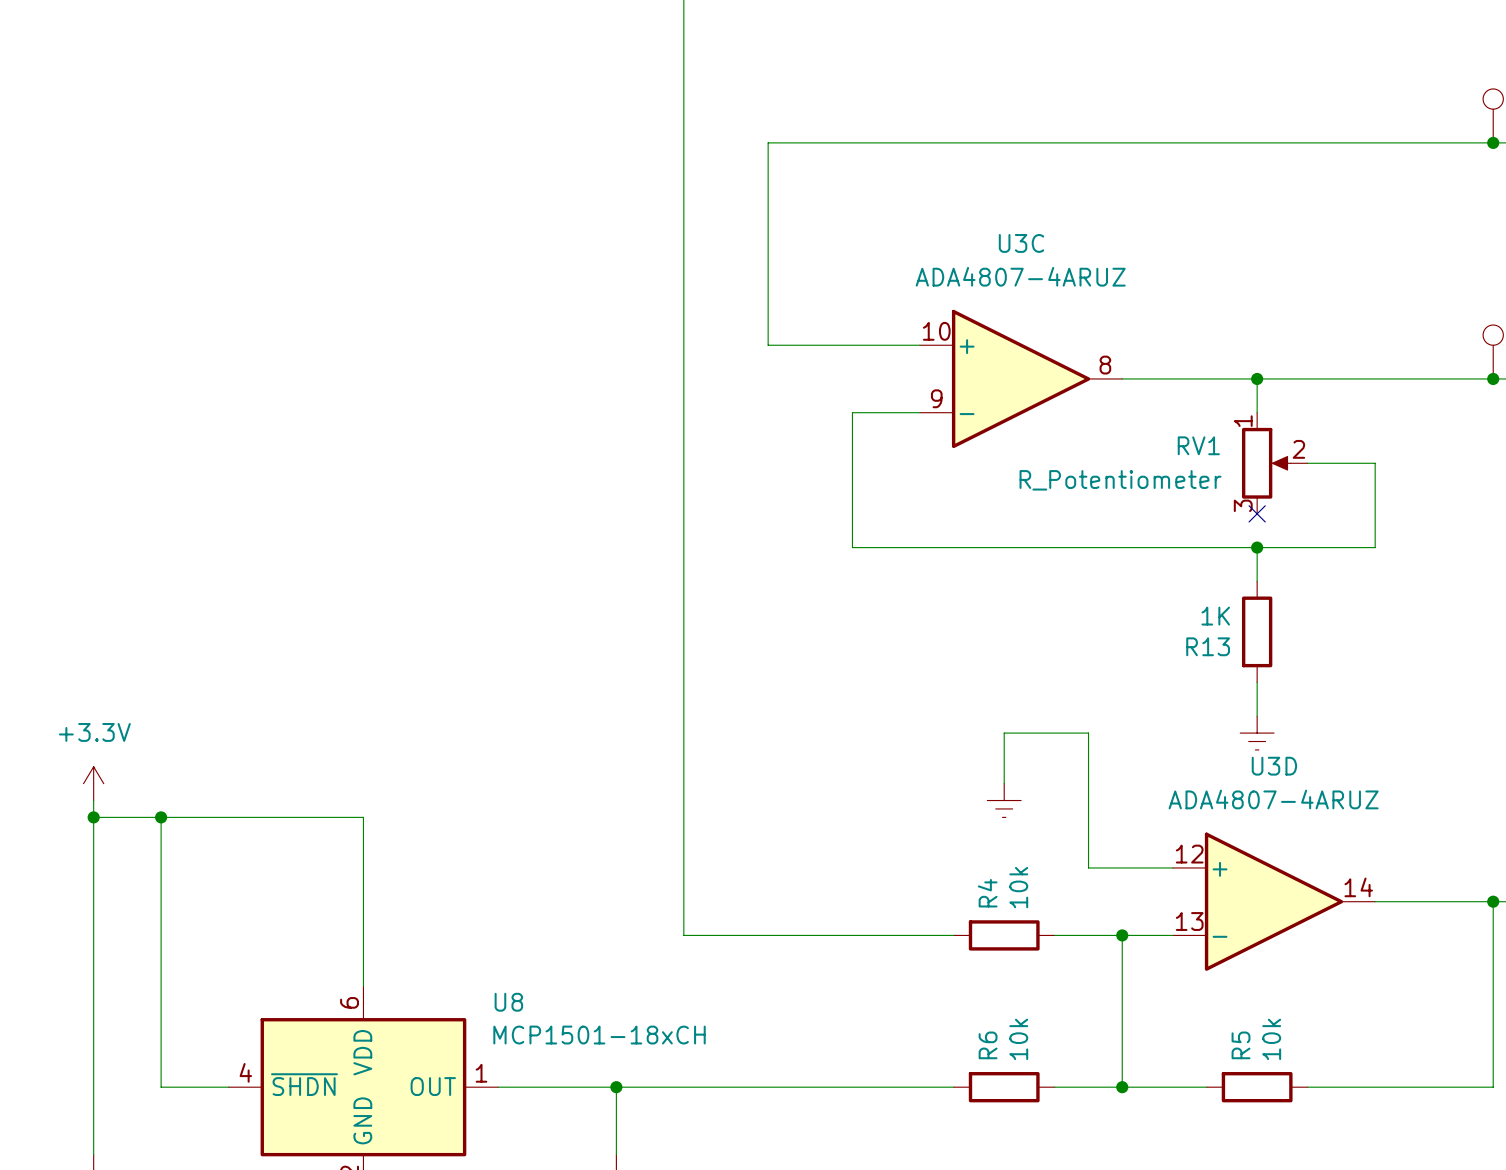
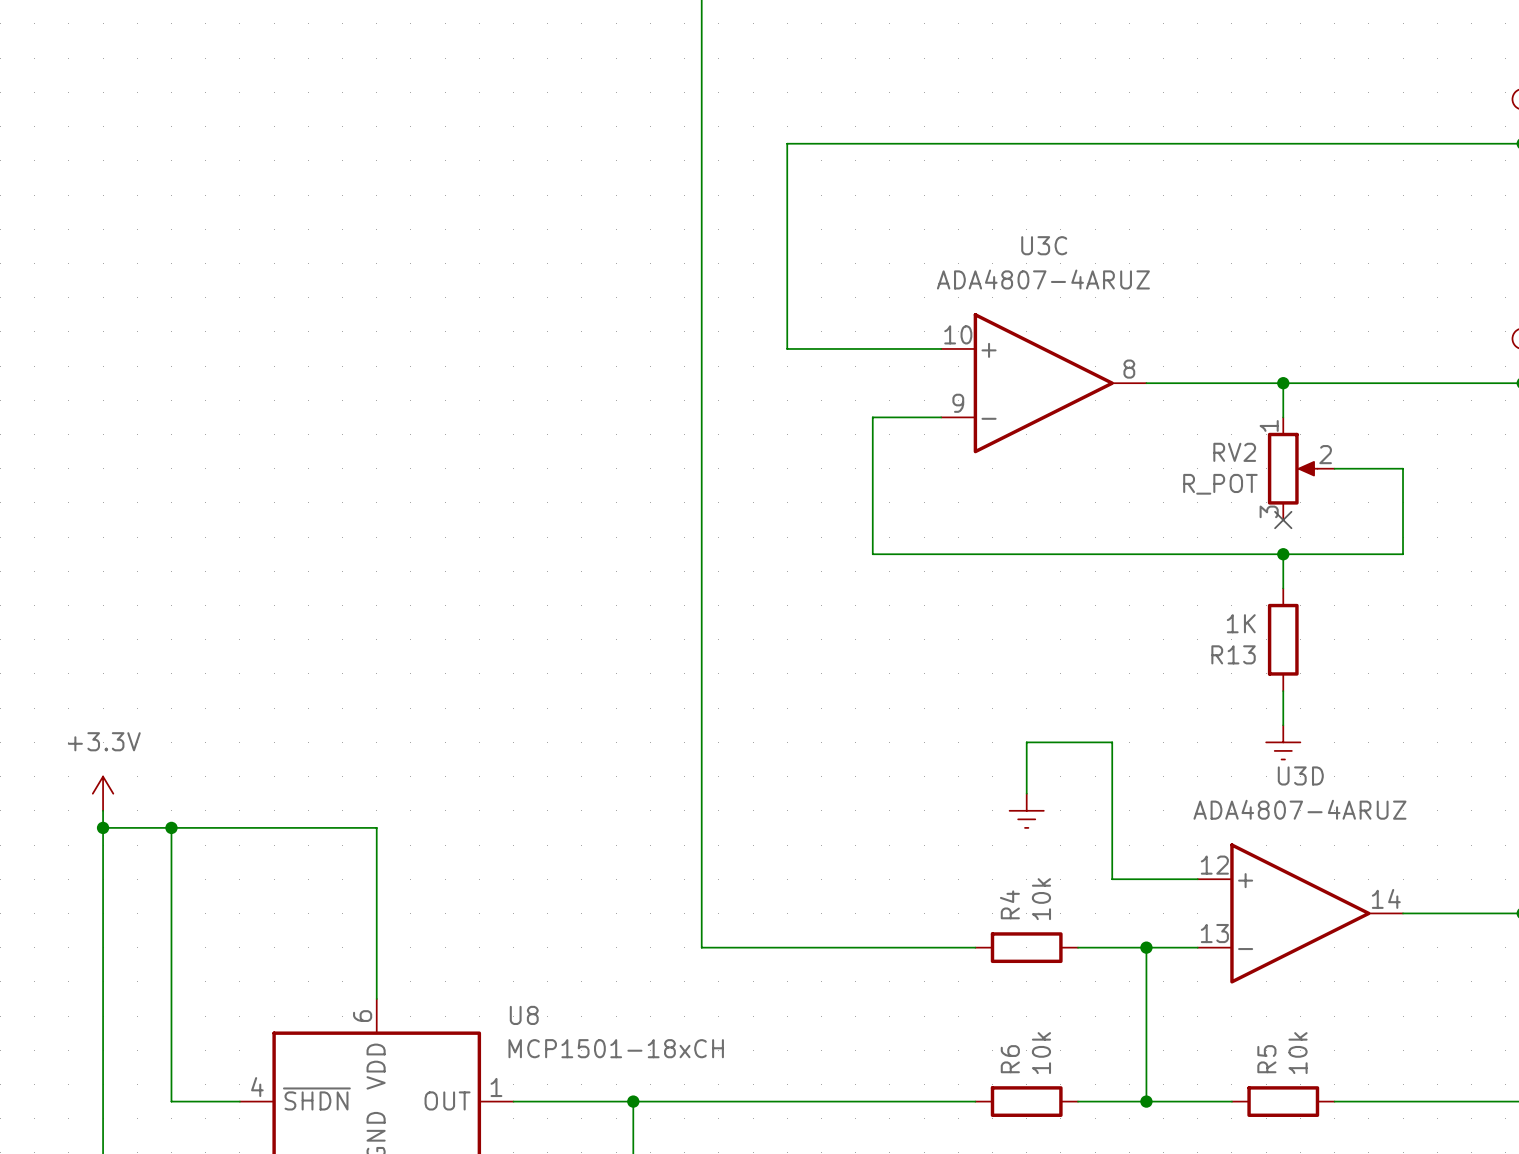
RV1 name: RV1 (1198, 445) -> RV2 (1234, 452)
RV1 value: R_Potentiometer (1120, 480) -> R_POT (1220, 484)

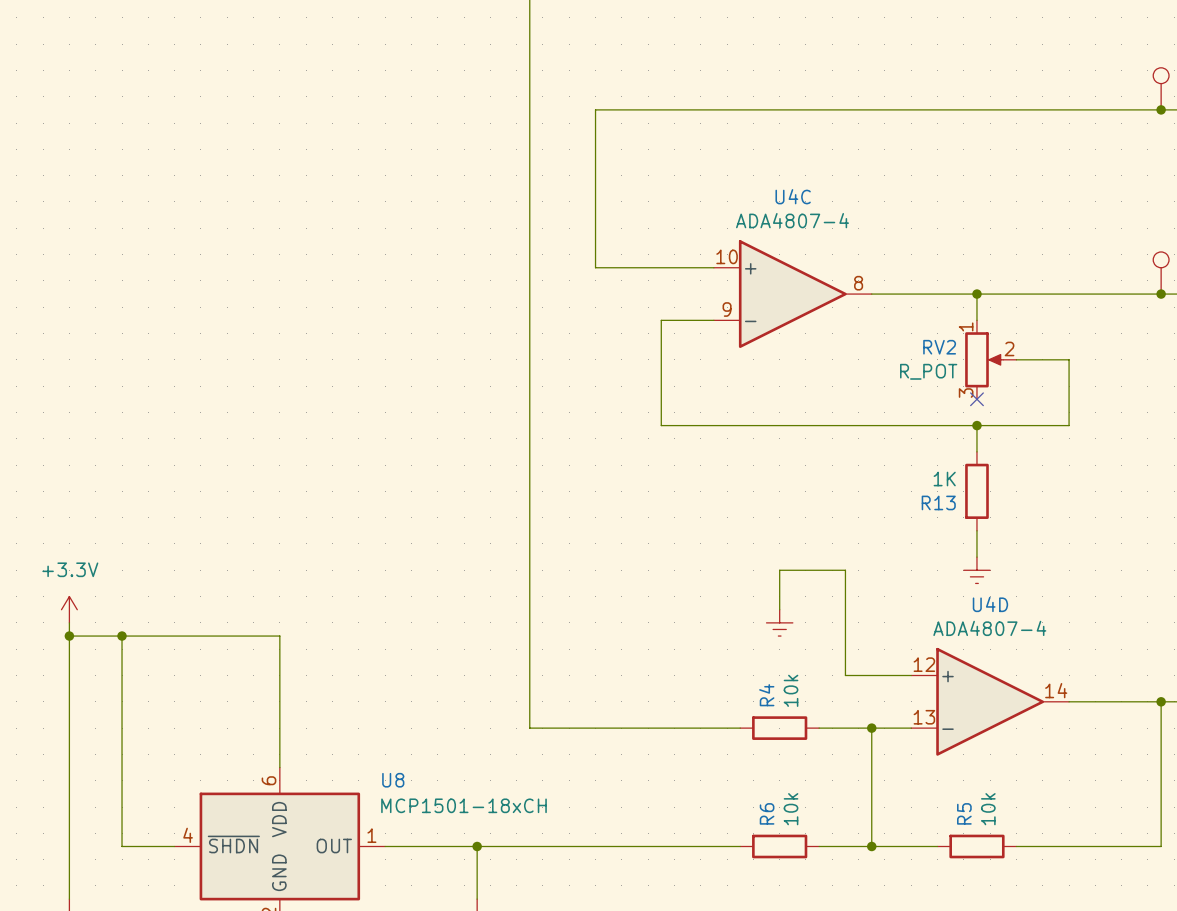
U3C name: U3C (1044, 245) -> U4C (793, 196)
U3C value: ADA4807-4ARUZ (1043, 279) -> ADA4807-4 (792, 220)
U3D name: U3D (1300, 775) -> U4D (990, 604)
U3D value: ADA4807-4ARUZ (1299, 809) -> ADA4807-4 (989, 628)

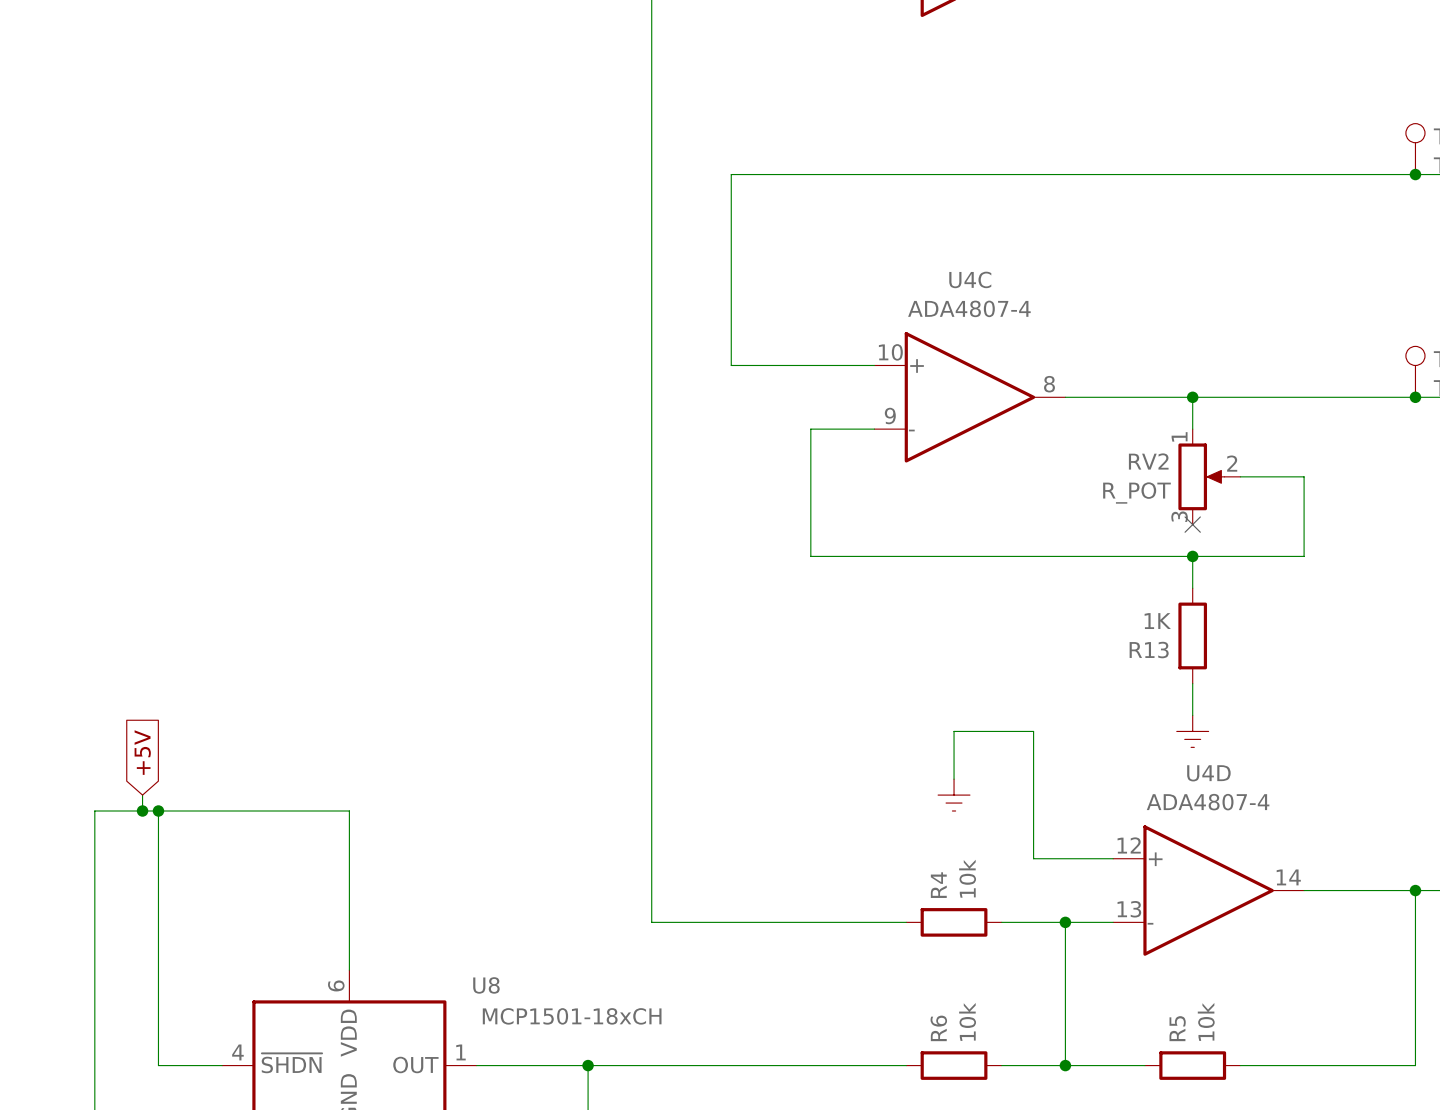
global label: none -> +5V (142, 752)
power symbol: +3.3V (69, 609) -> none
wire: (69, 622) (69, 636) -> (142, 795) (142, 810)
junction position: (69, 636) -> (142, 810)

